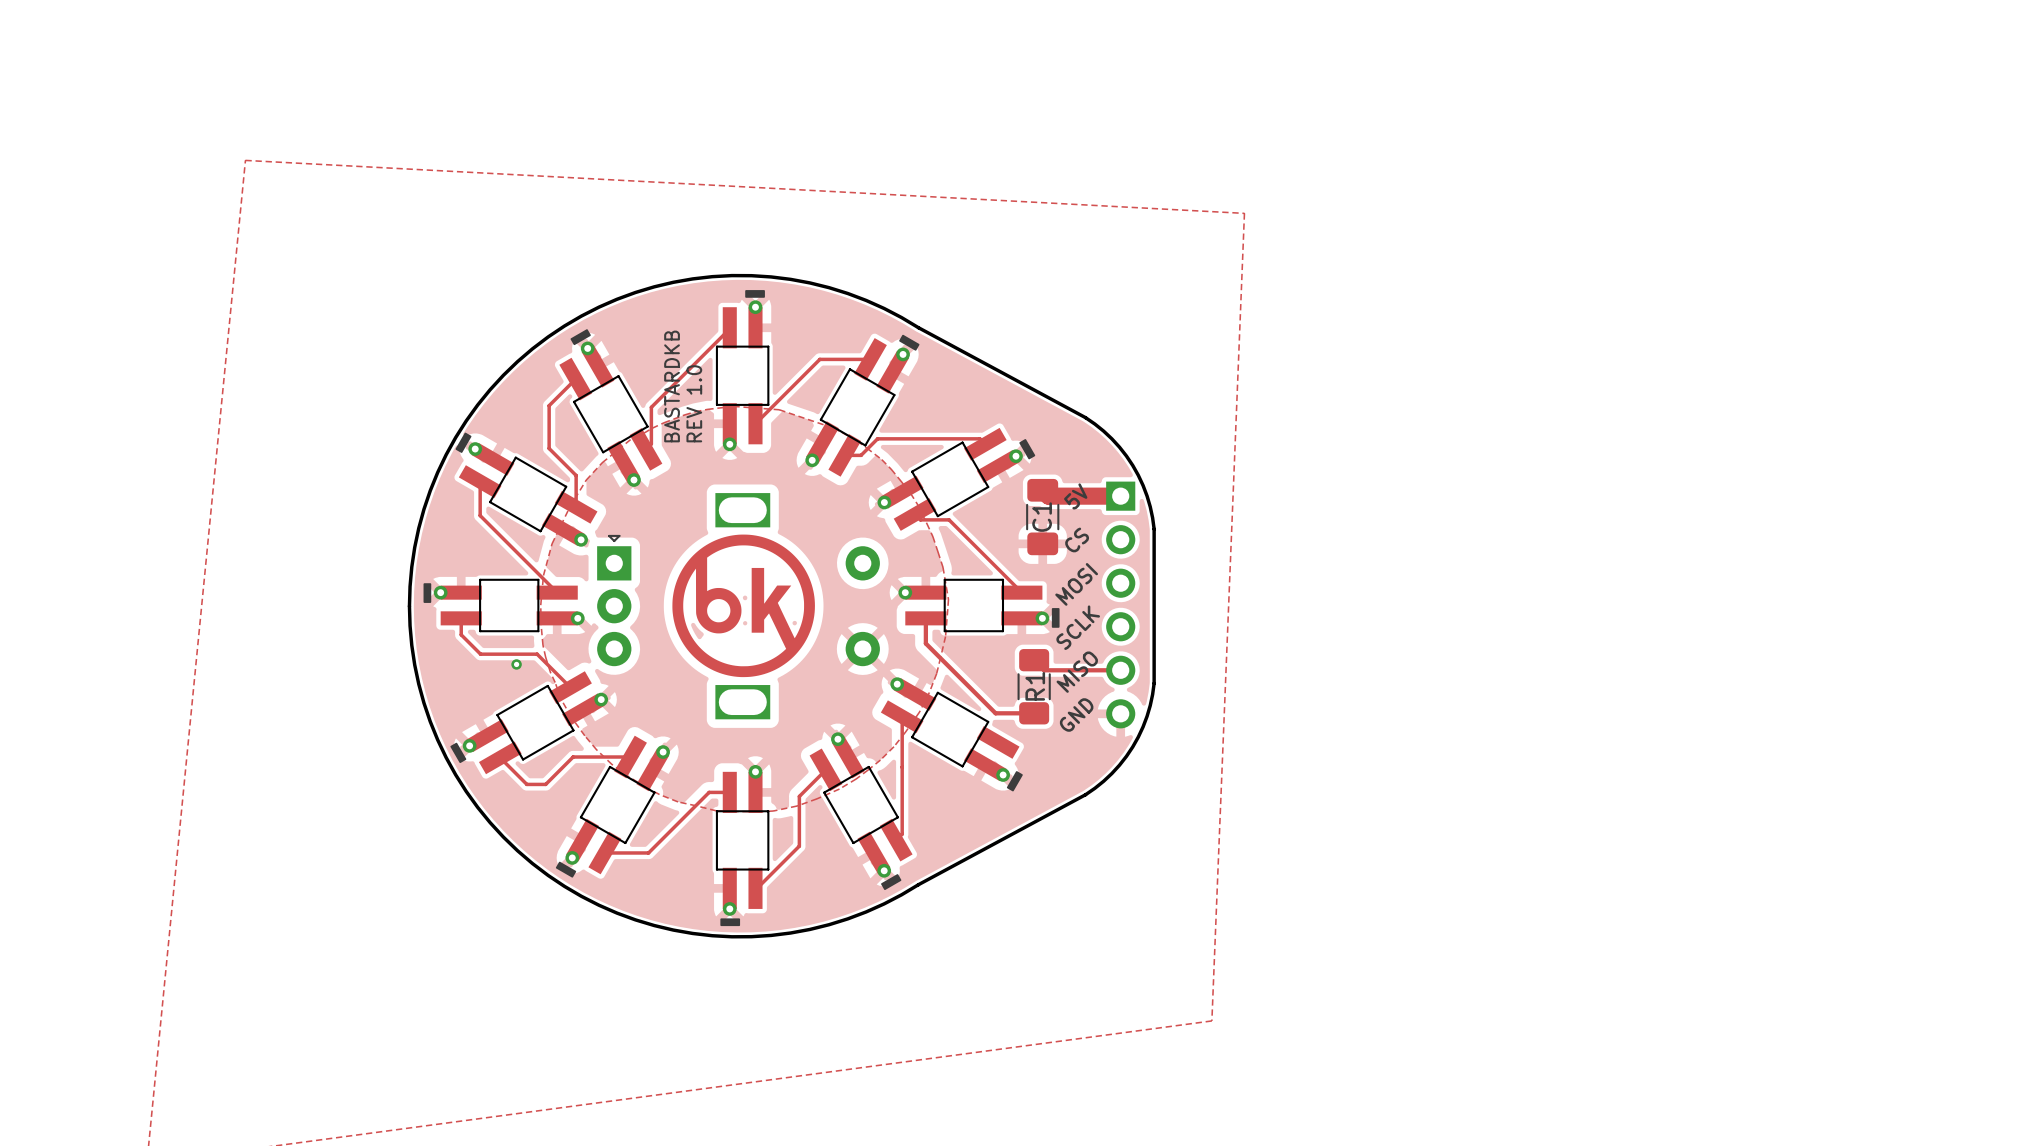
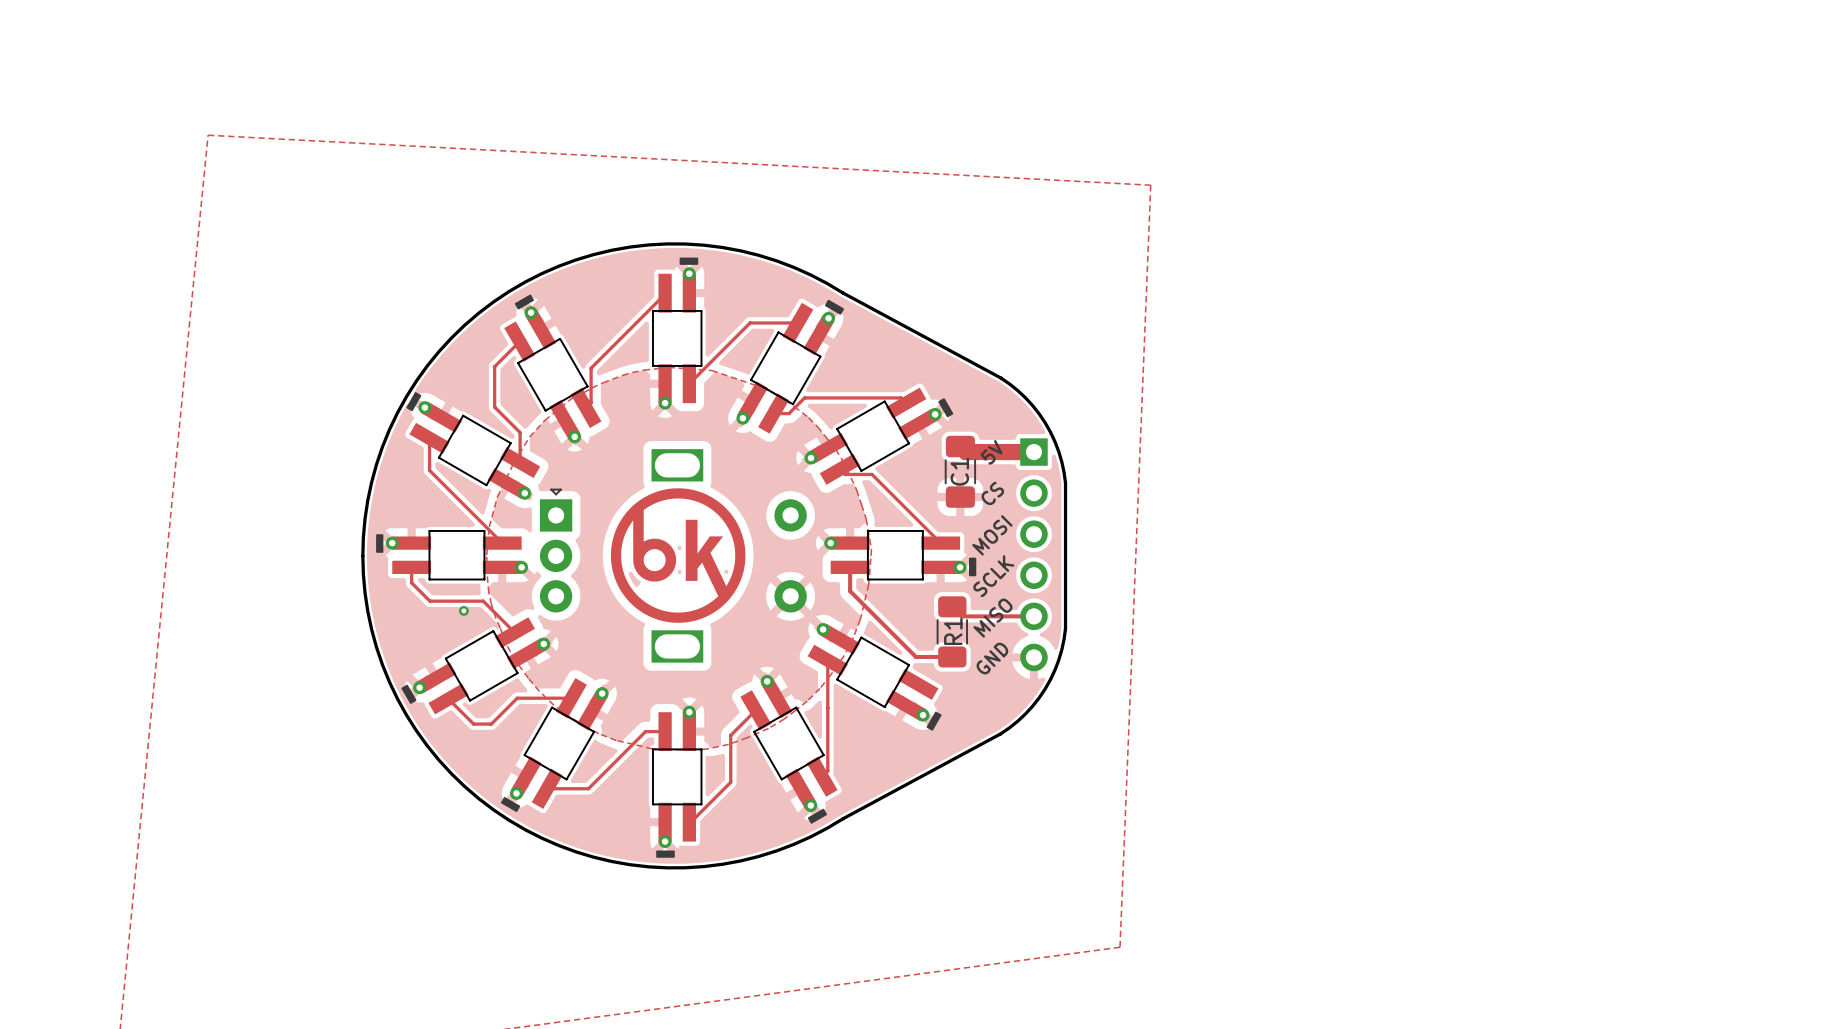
text: BASTARDKB (672, 386) -> none
text: REV 1.0 (694, 403) -> none

